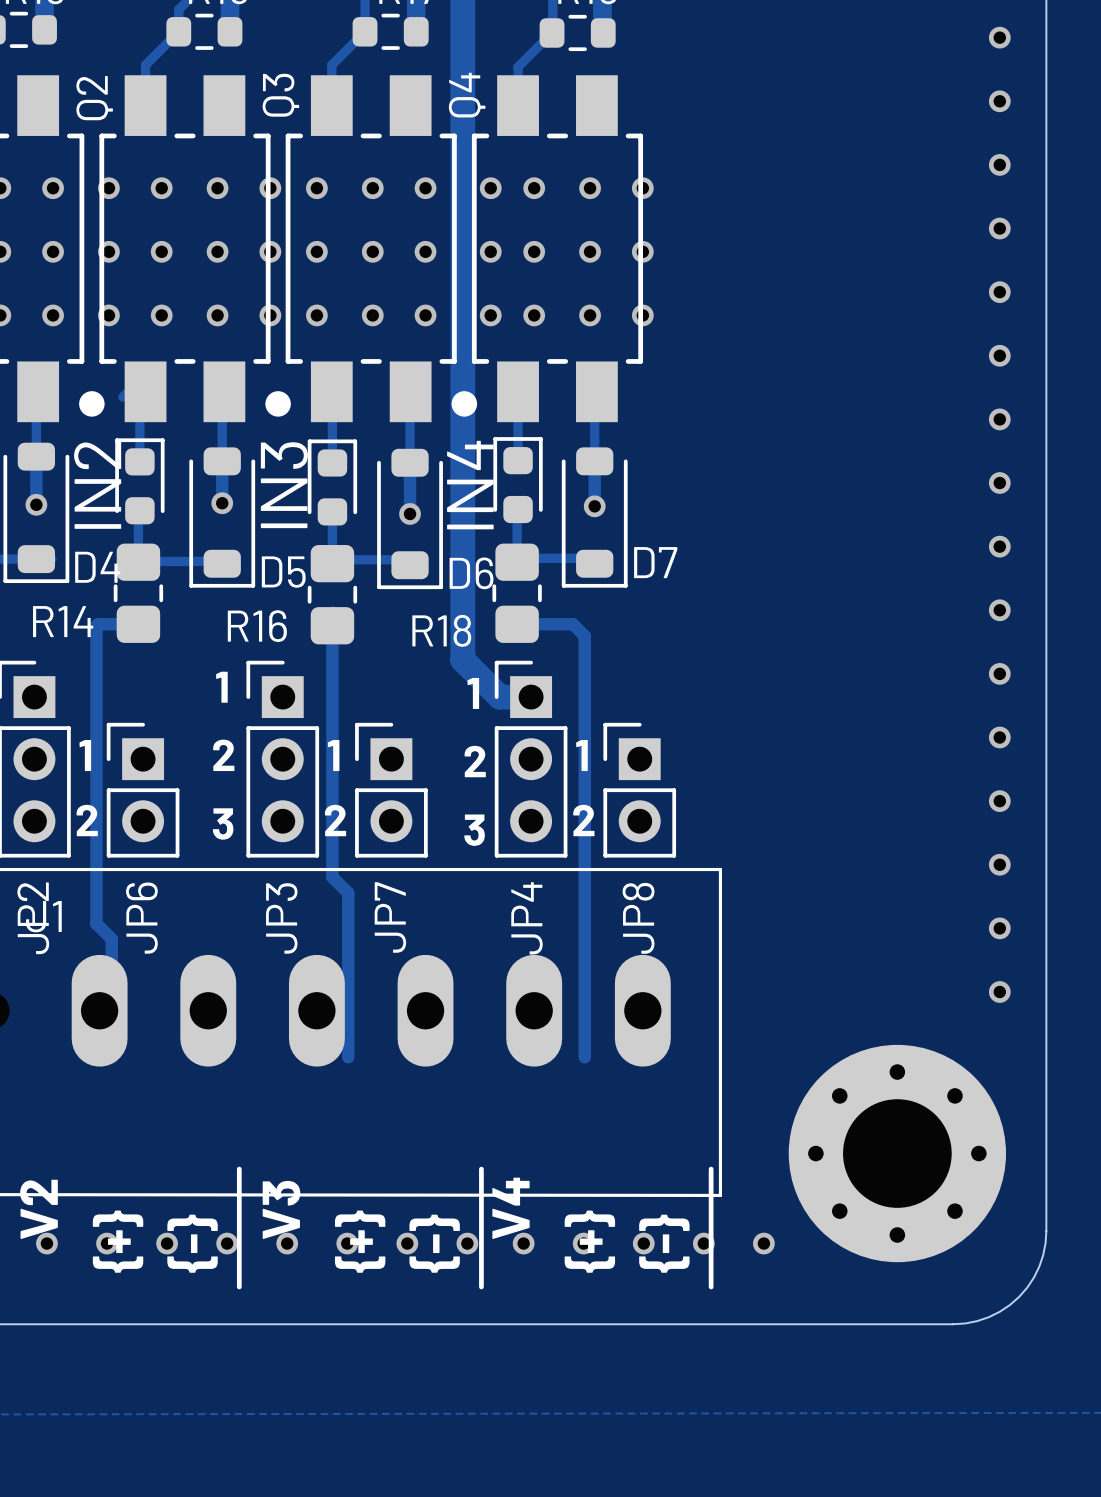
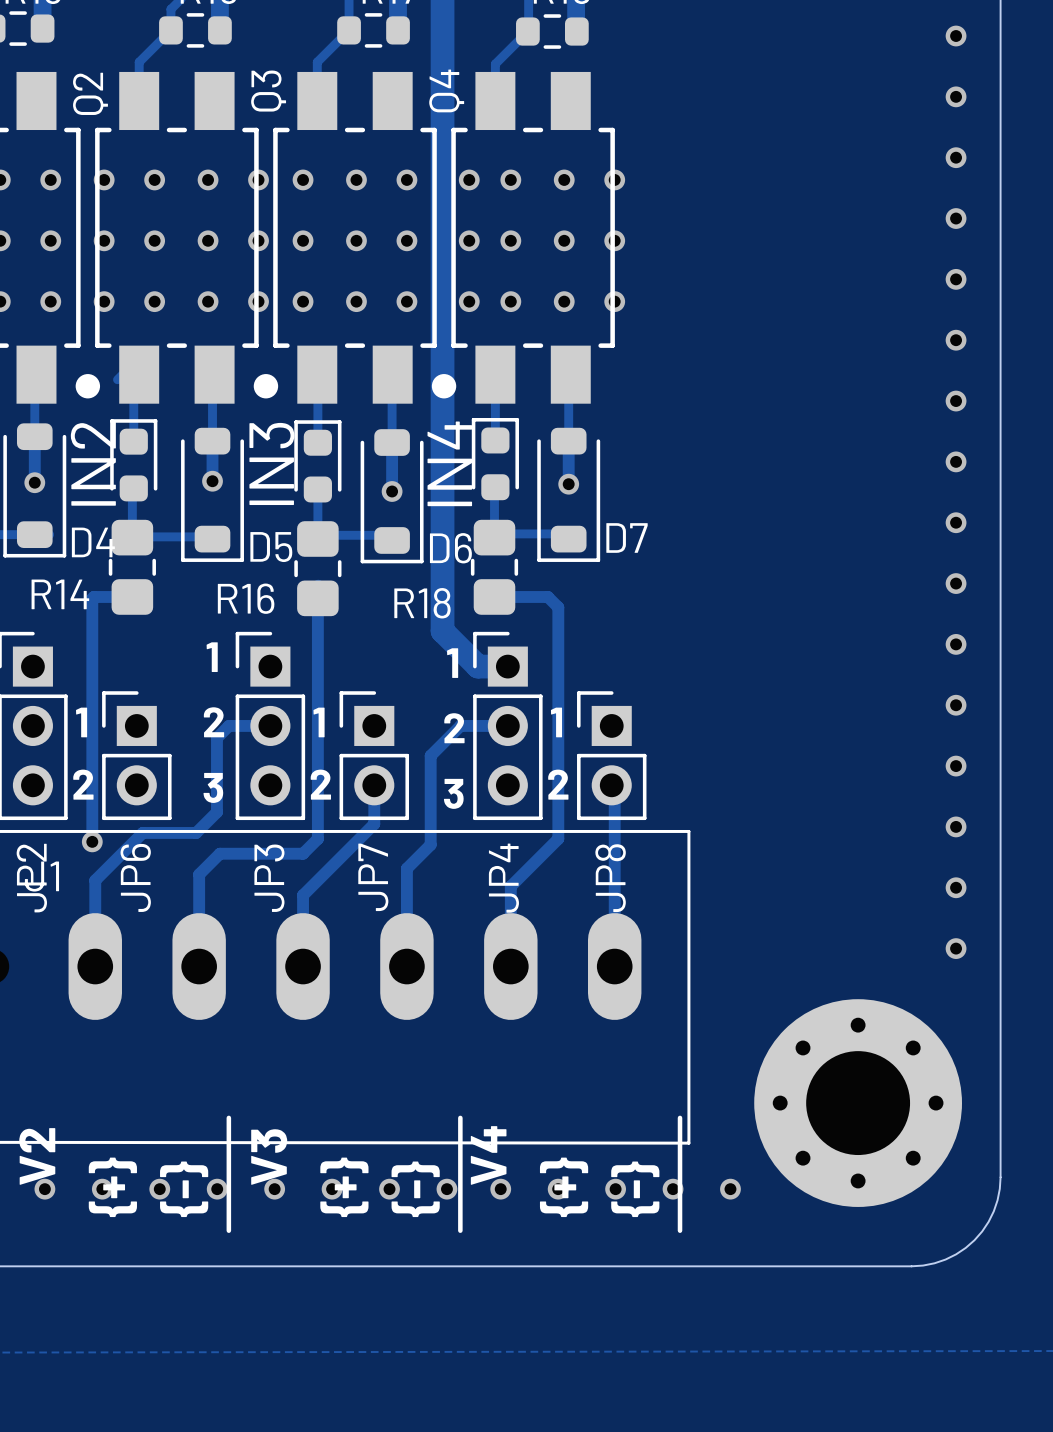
track: (583, 635) (584, 1057) -> (558, 607) (558, 838) (510, 886) (510, 966)
track: none -> (270, 725) (228, 725) (216, 737) (216, 812) (196, 832) (142, 832) (95, 880) (95, 966)
track: none -> (507, 725) (460, 725) (430, 755) (430, 844) (406, 868) (406, 966)
track: none -> (374, 785) (374, 824) (303, 895) (303, 966)
track: none -> (611, 785) (614, 788) (614, 966)
track: (332, 877) (348, 893) (348, 1057) -> (317, 838) (303, 853) (219, 853) (199, 874) (199, 966)
track: (96, 880) (96, 923) (111, 939) (111, 1057) -> none
via: none -> (92, 841)

